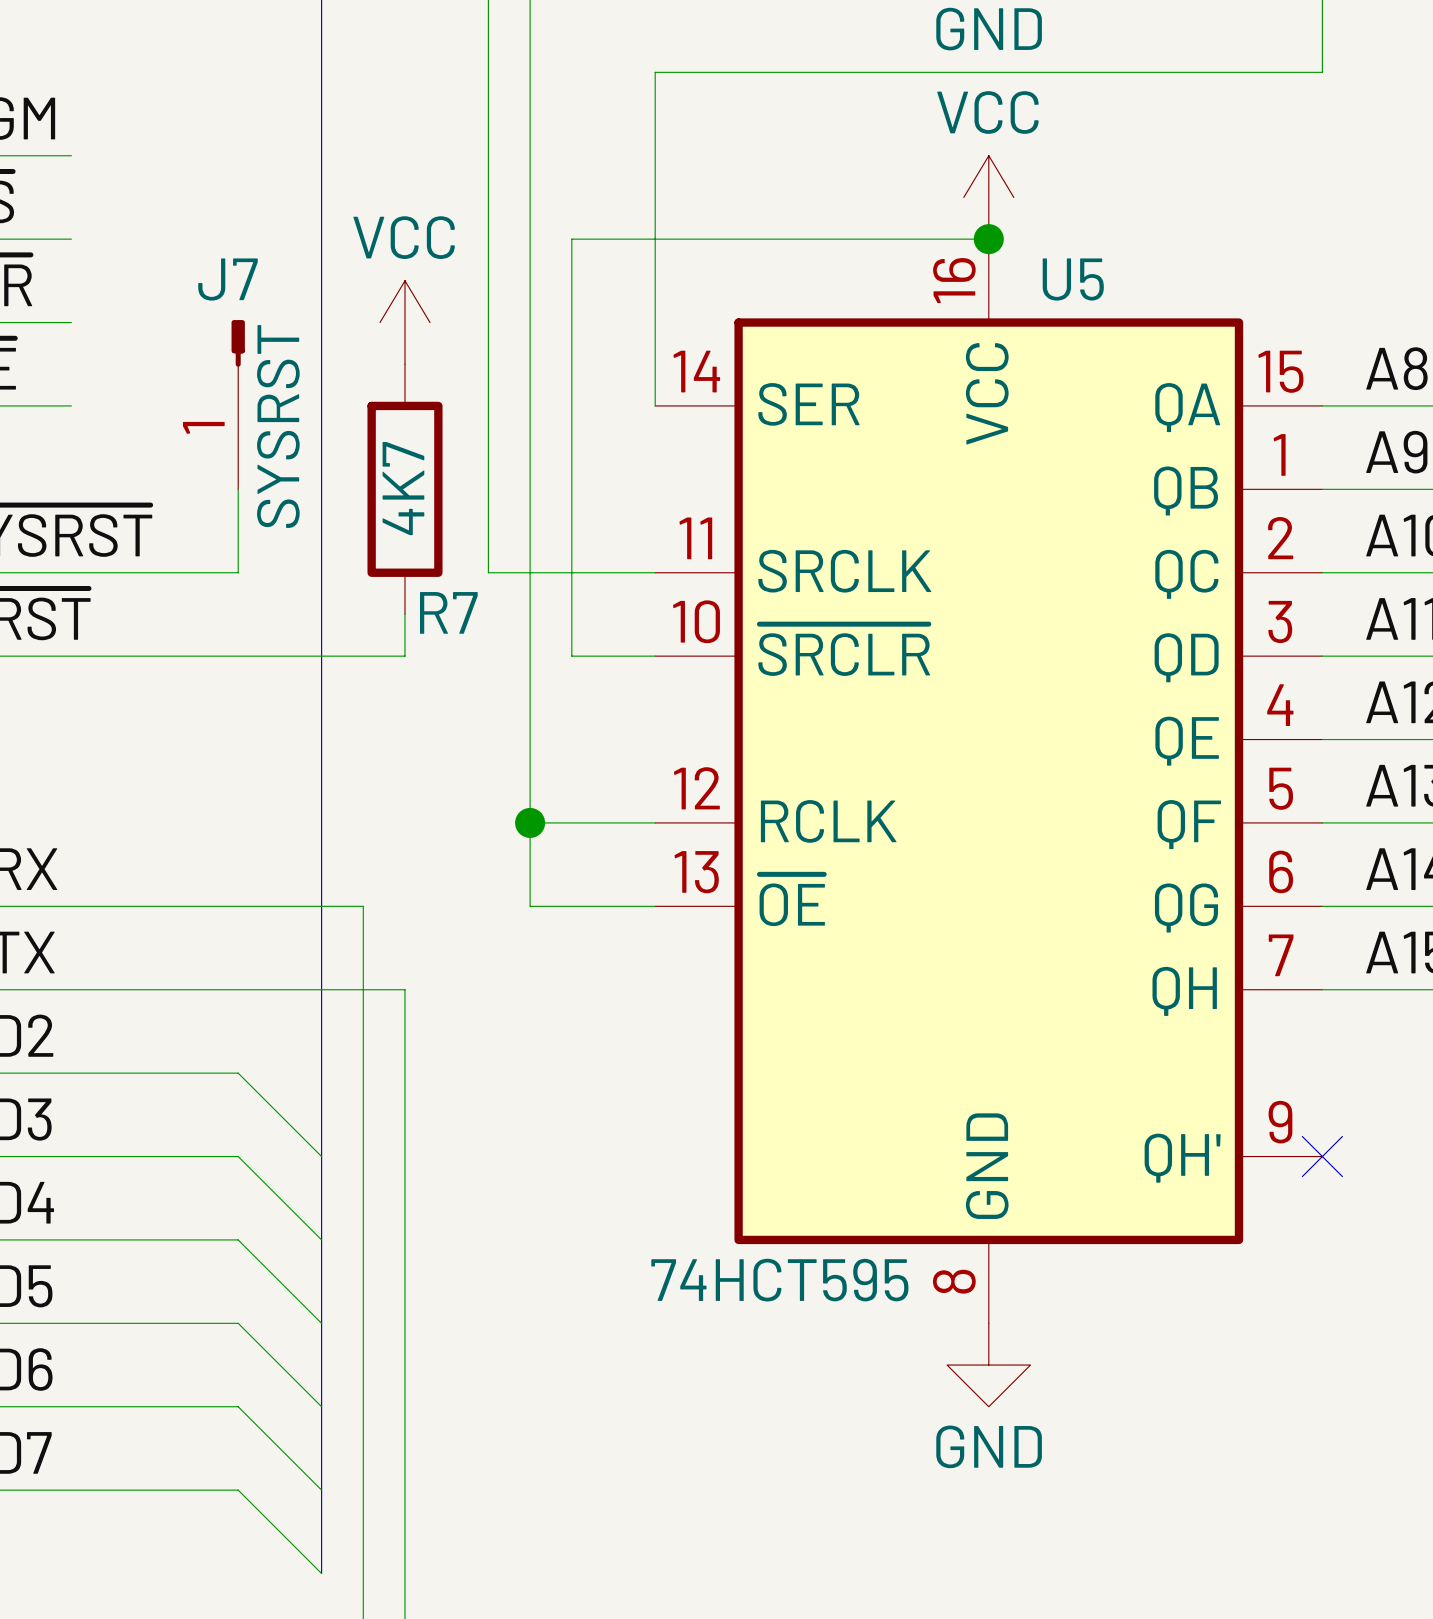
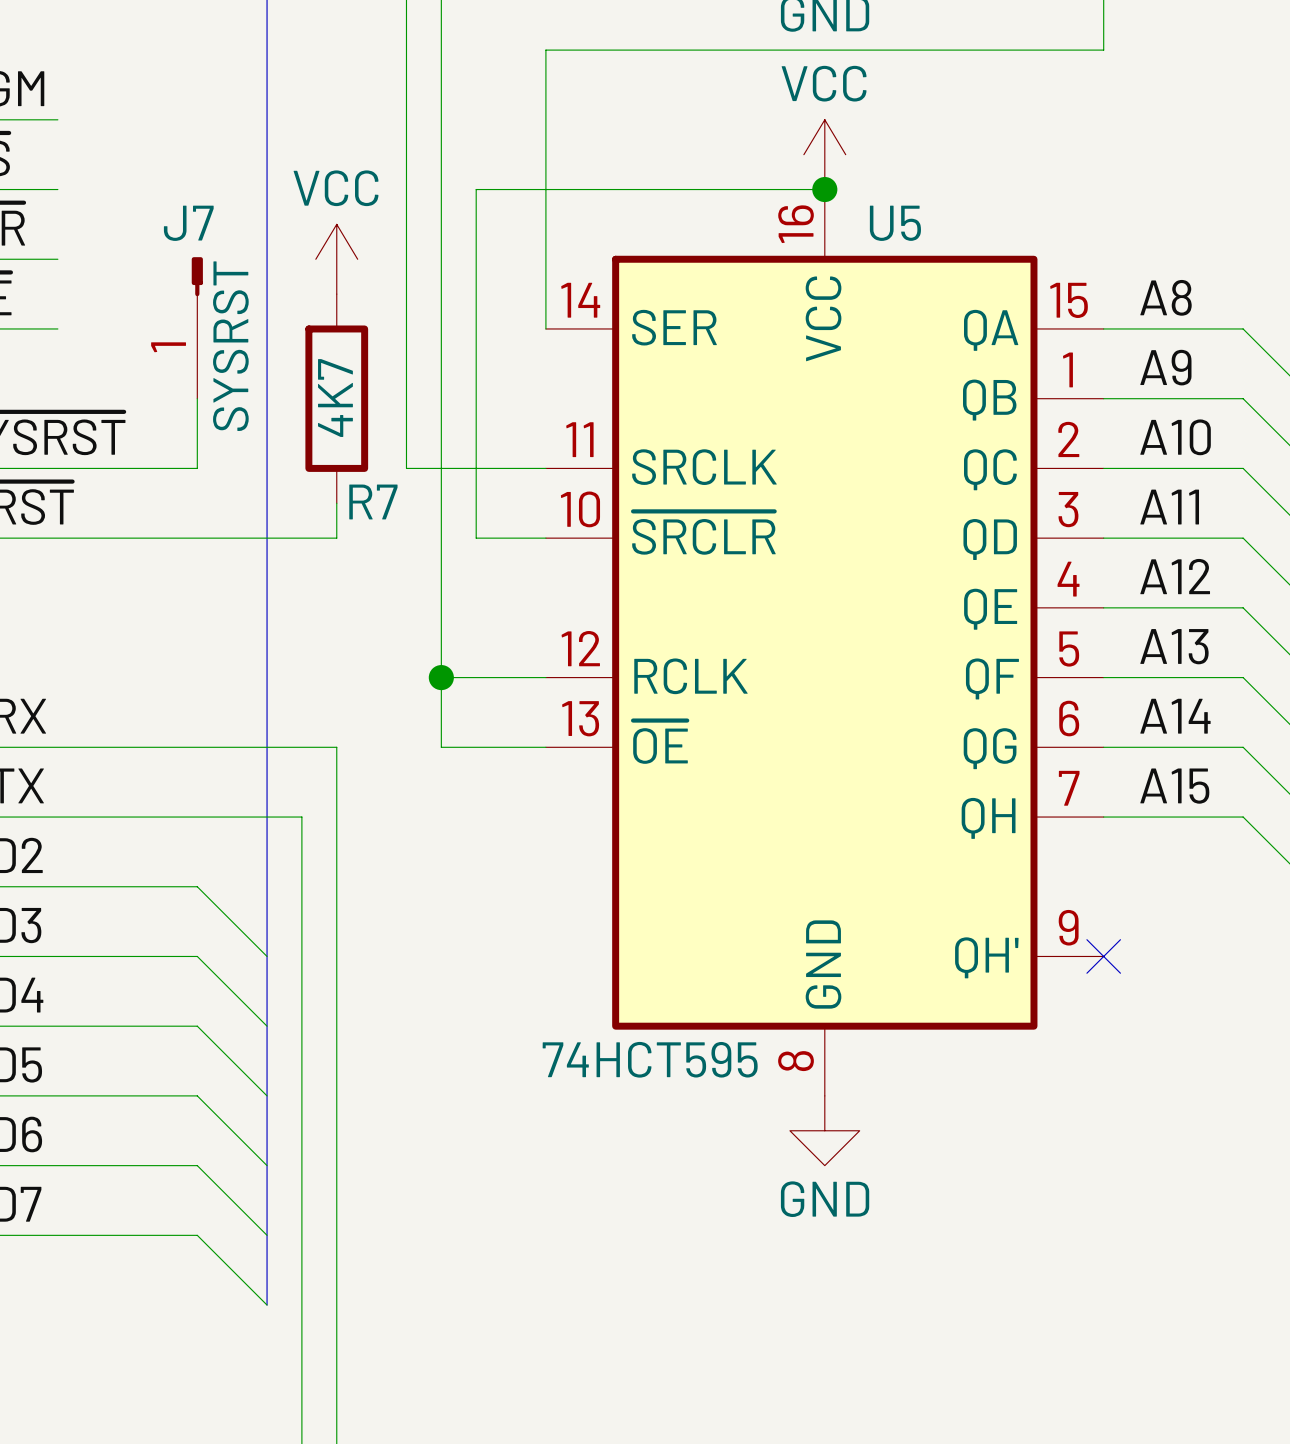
wire: (363, 906) (363, 989) (405, 989) -> (301, 747) (336, 747) (336, 817)

